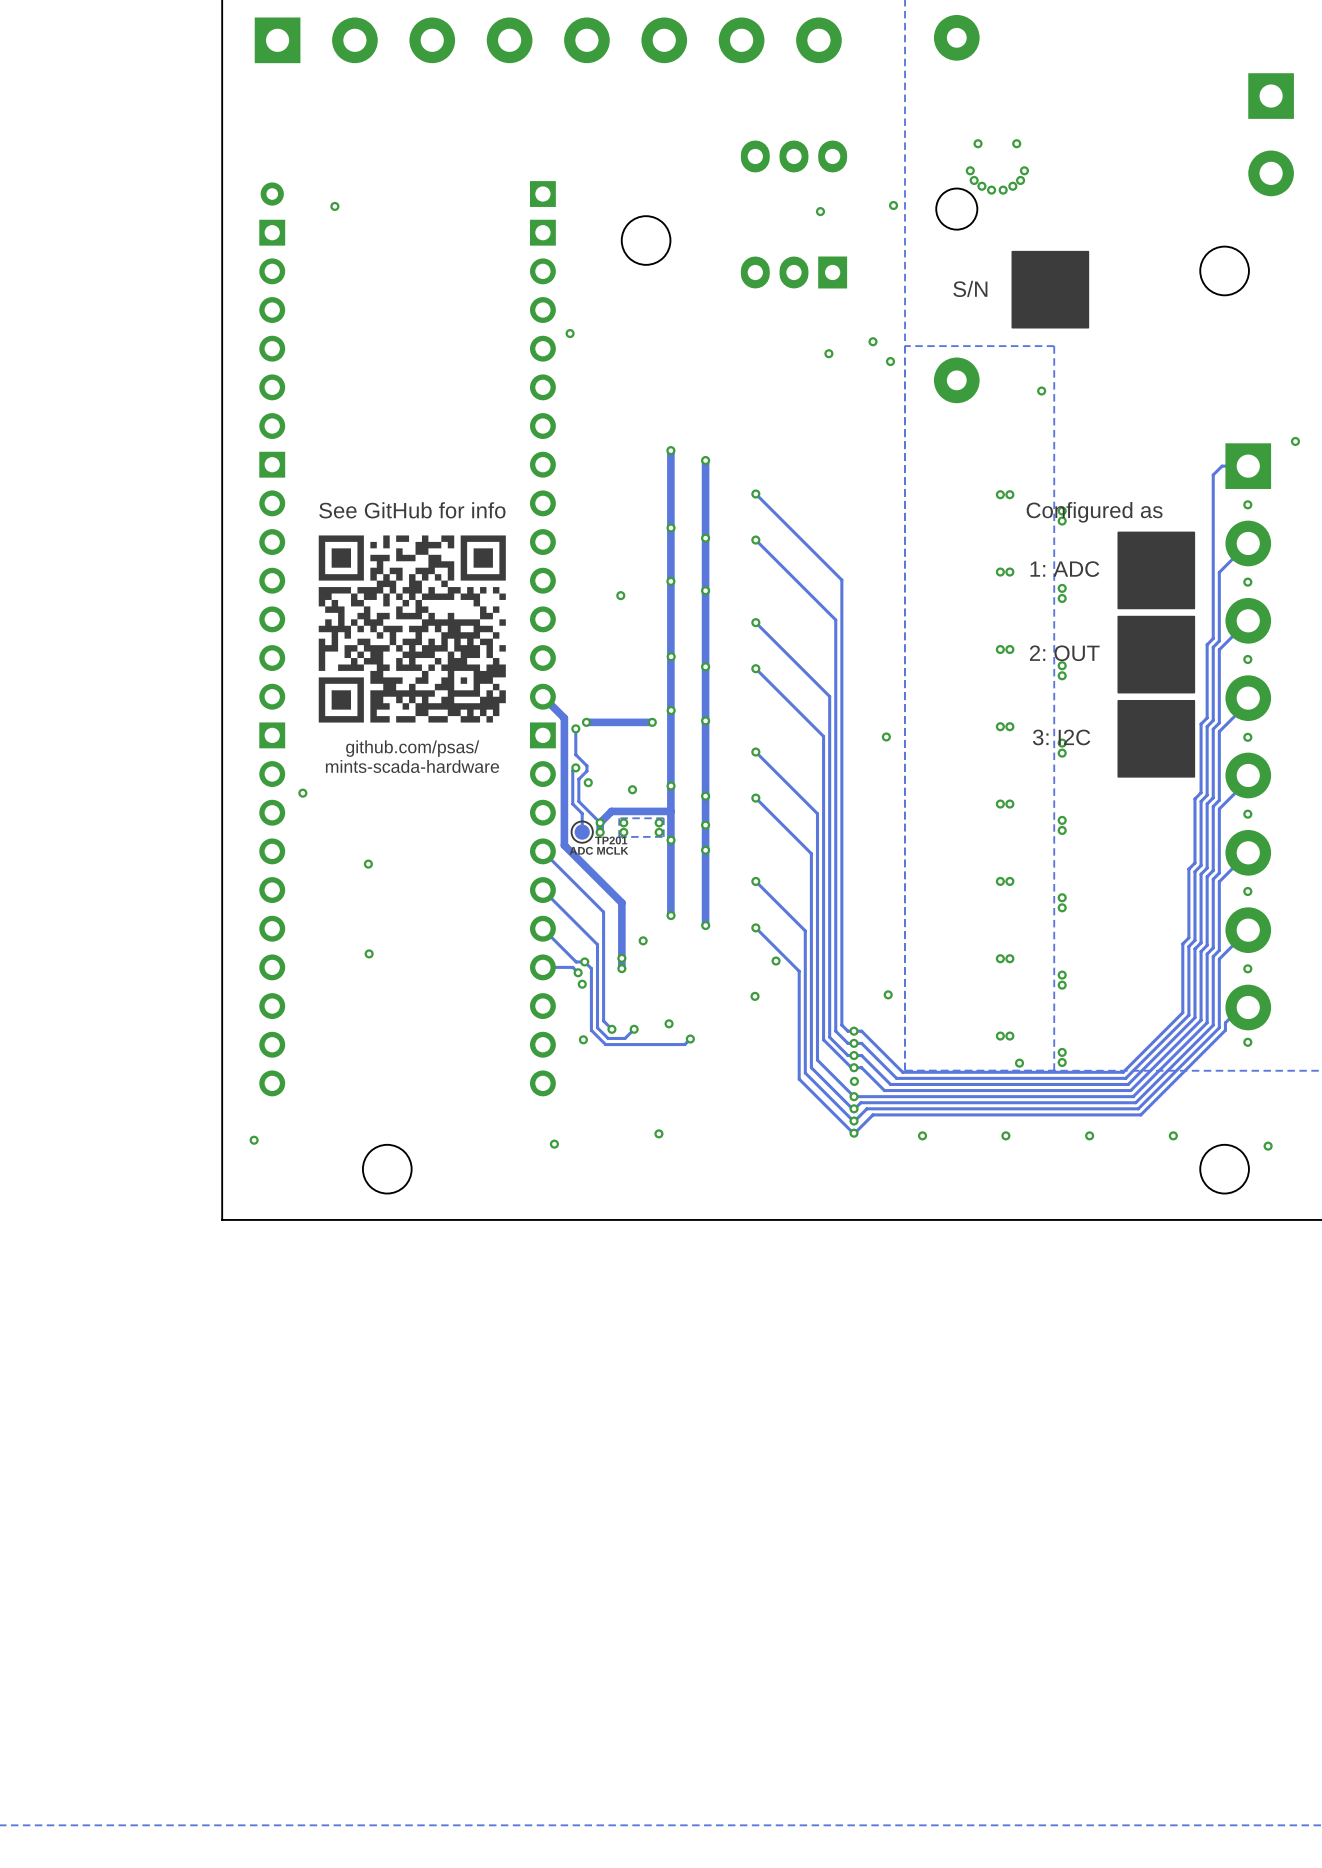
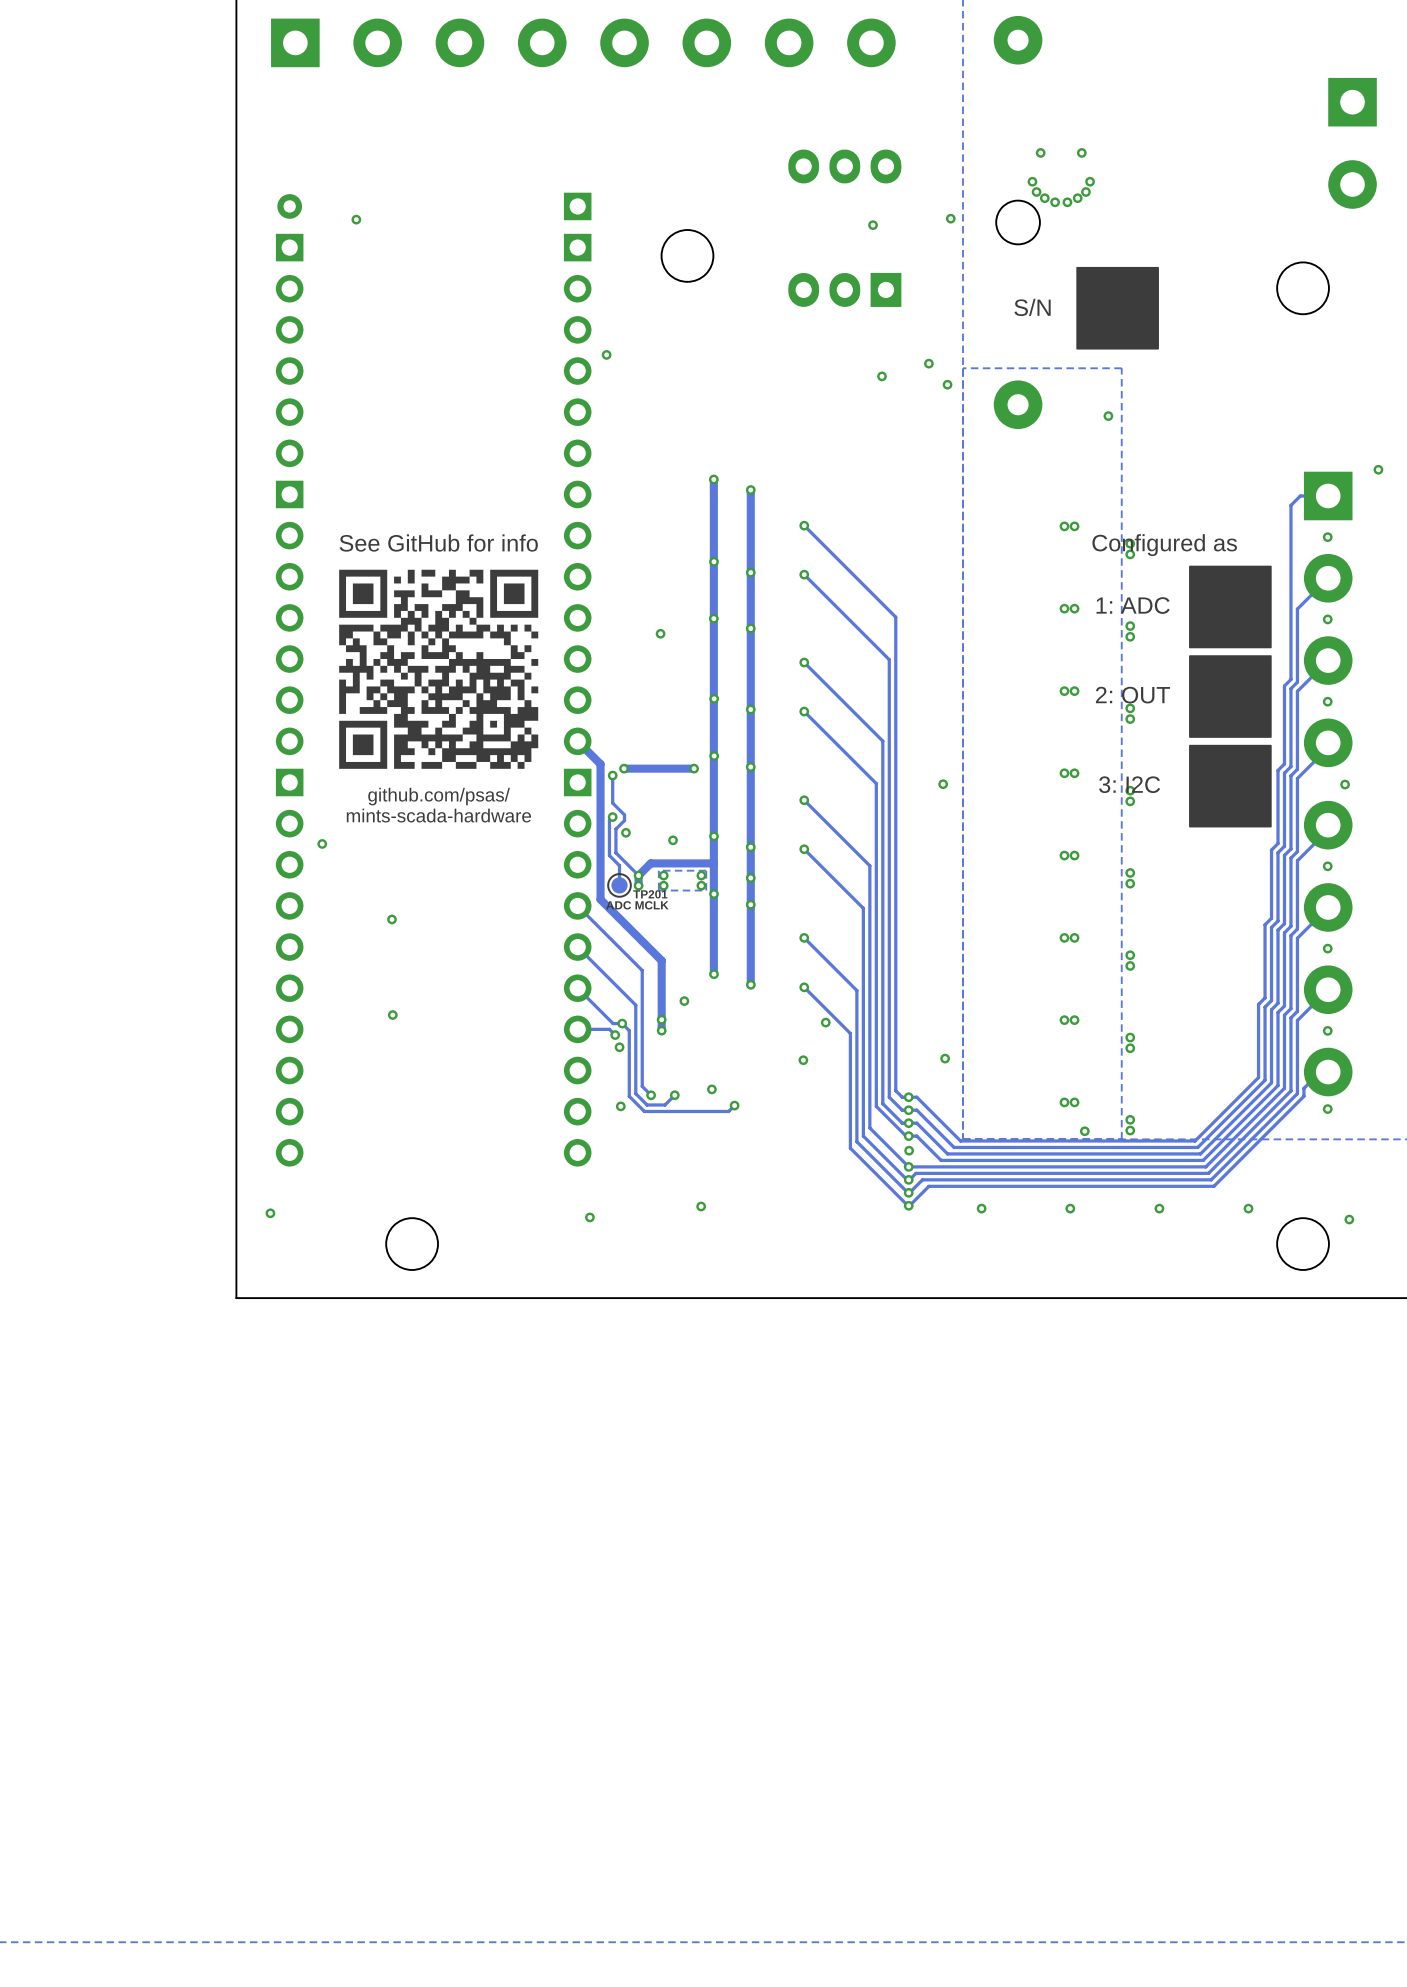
via position: (1247, 737) -> (1345, 784)

